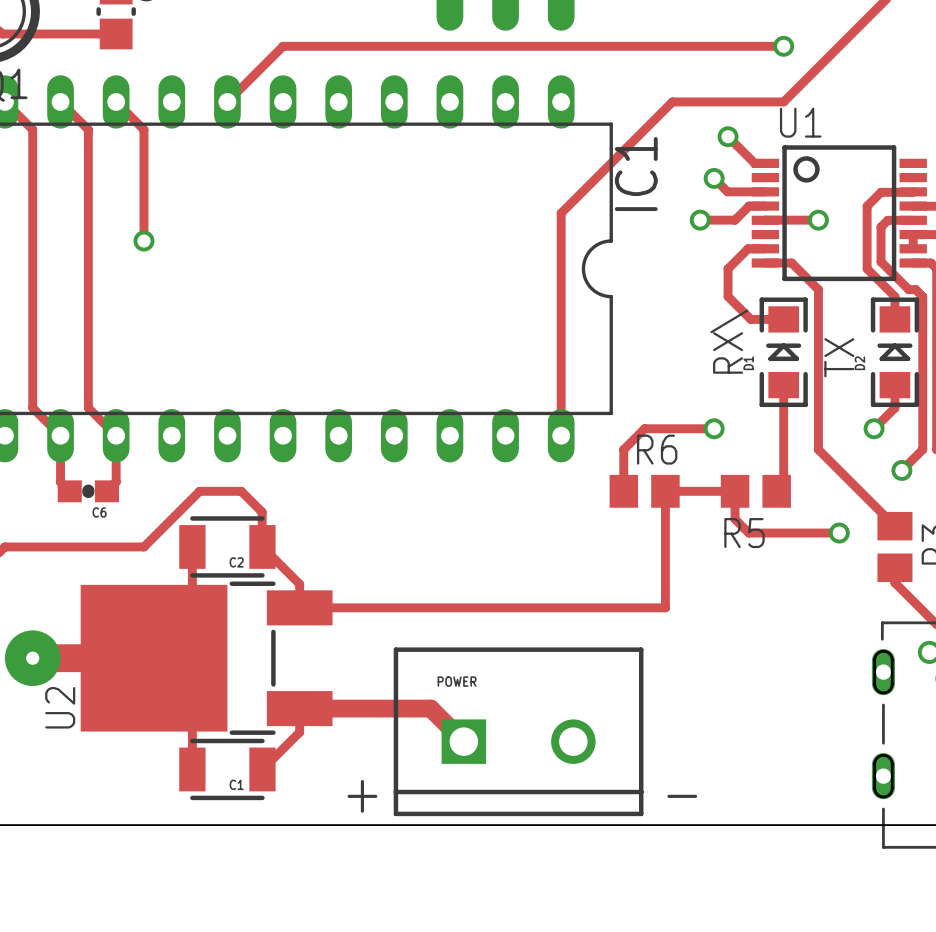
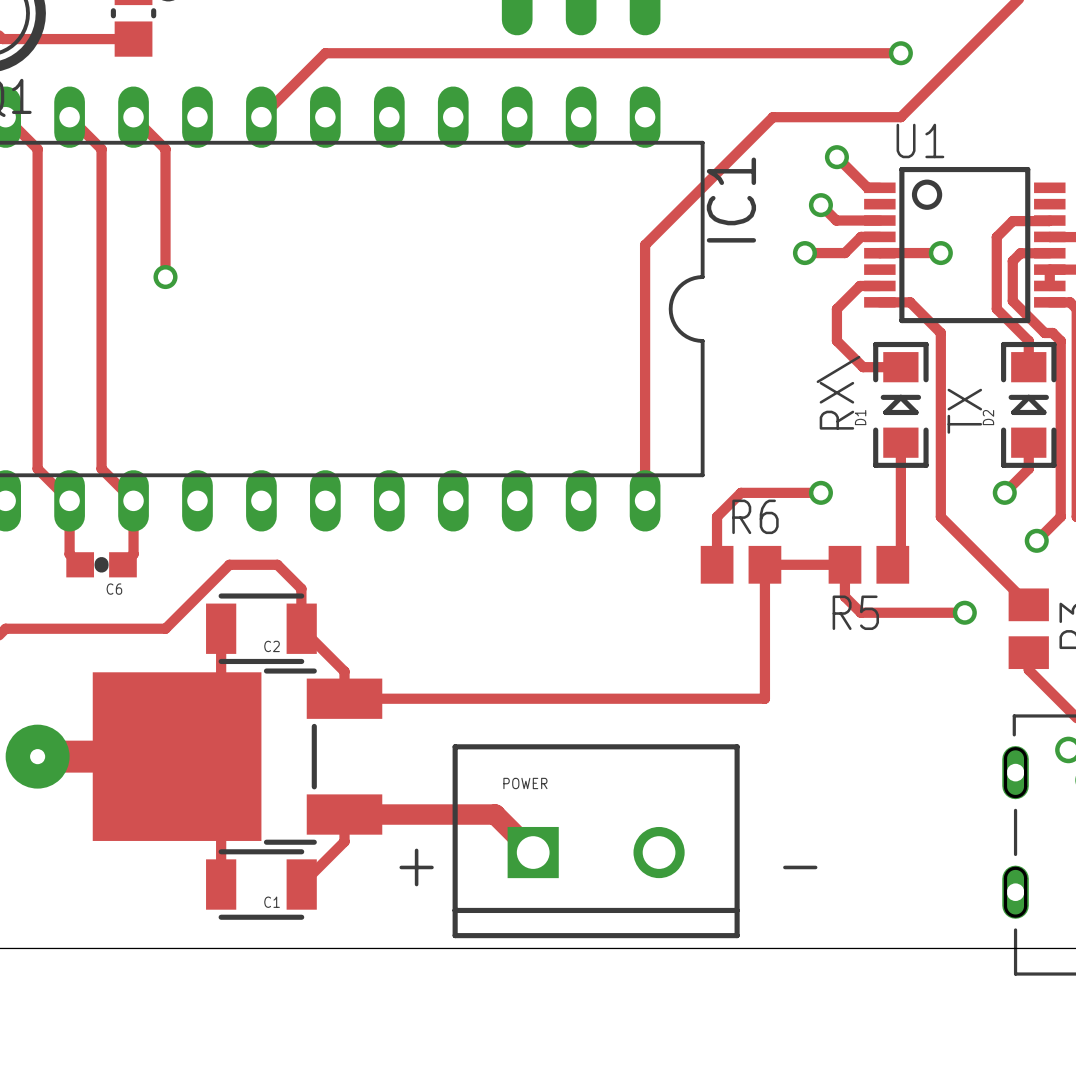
U2 name: U2 (60, 707) -> none
text position: + (362, 796) -> + (416, 867)
text position: - (682, 796) -> - (800, 867)

